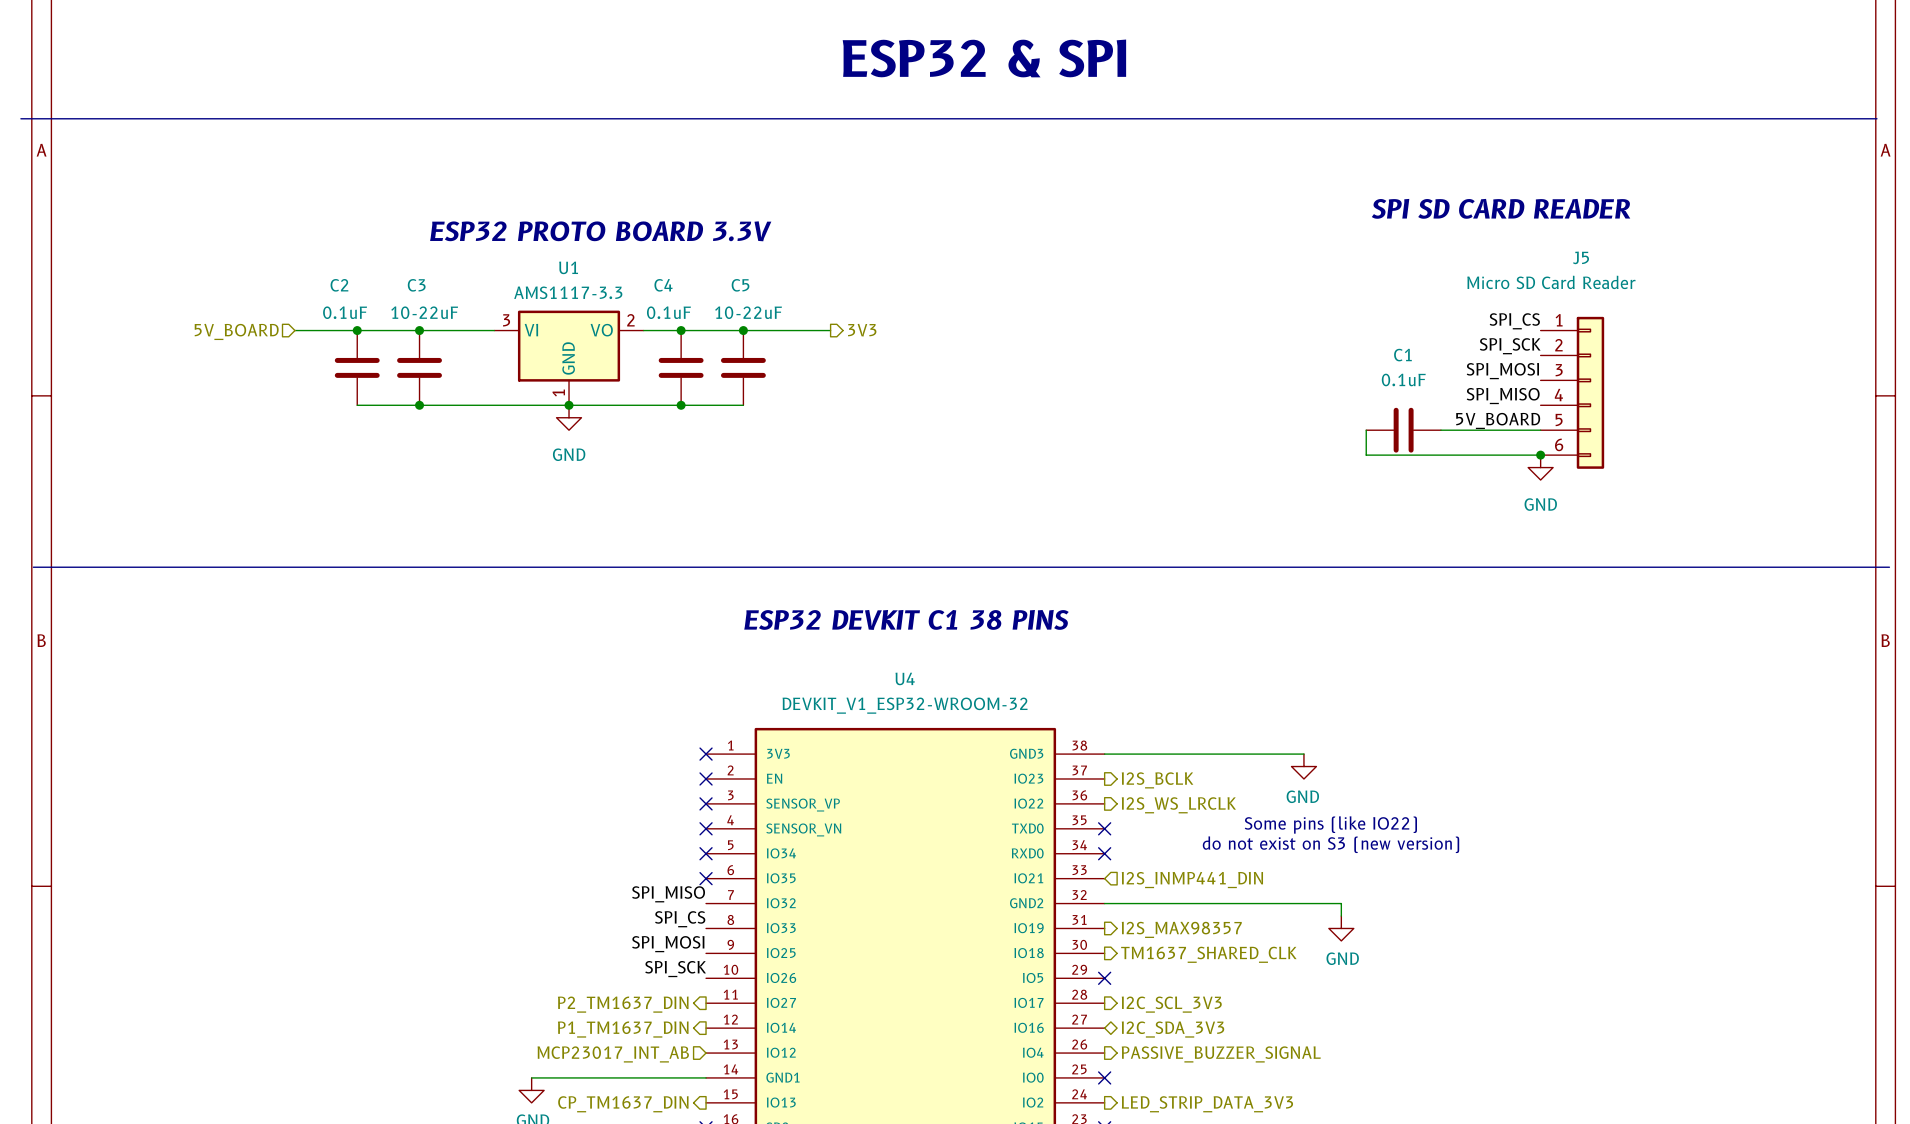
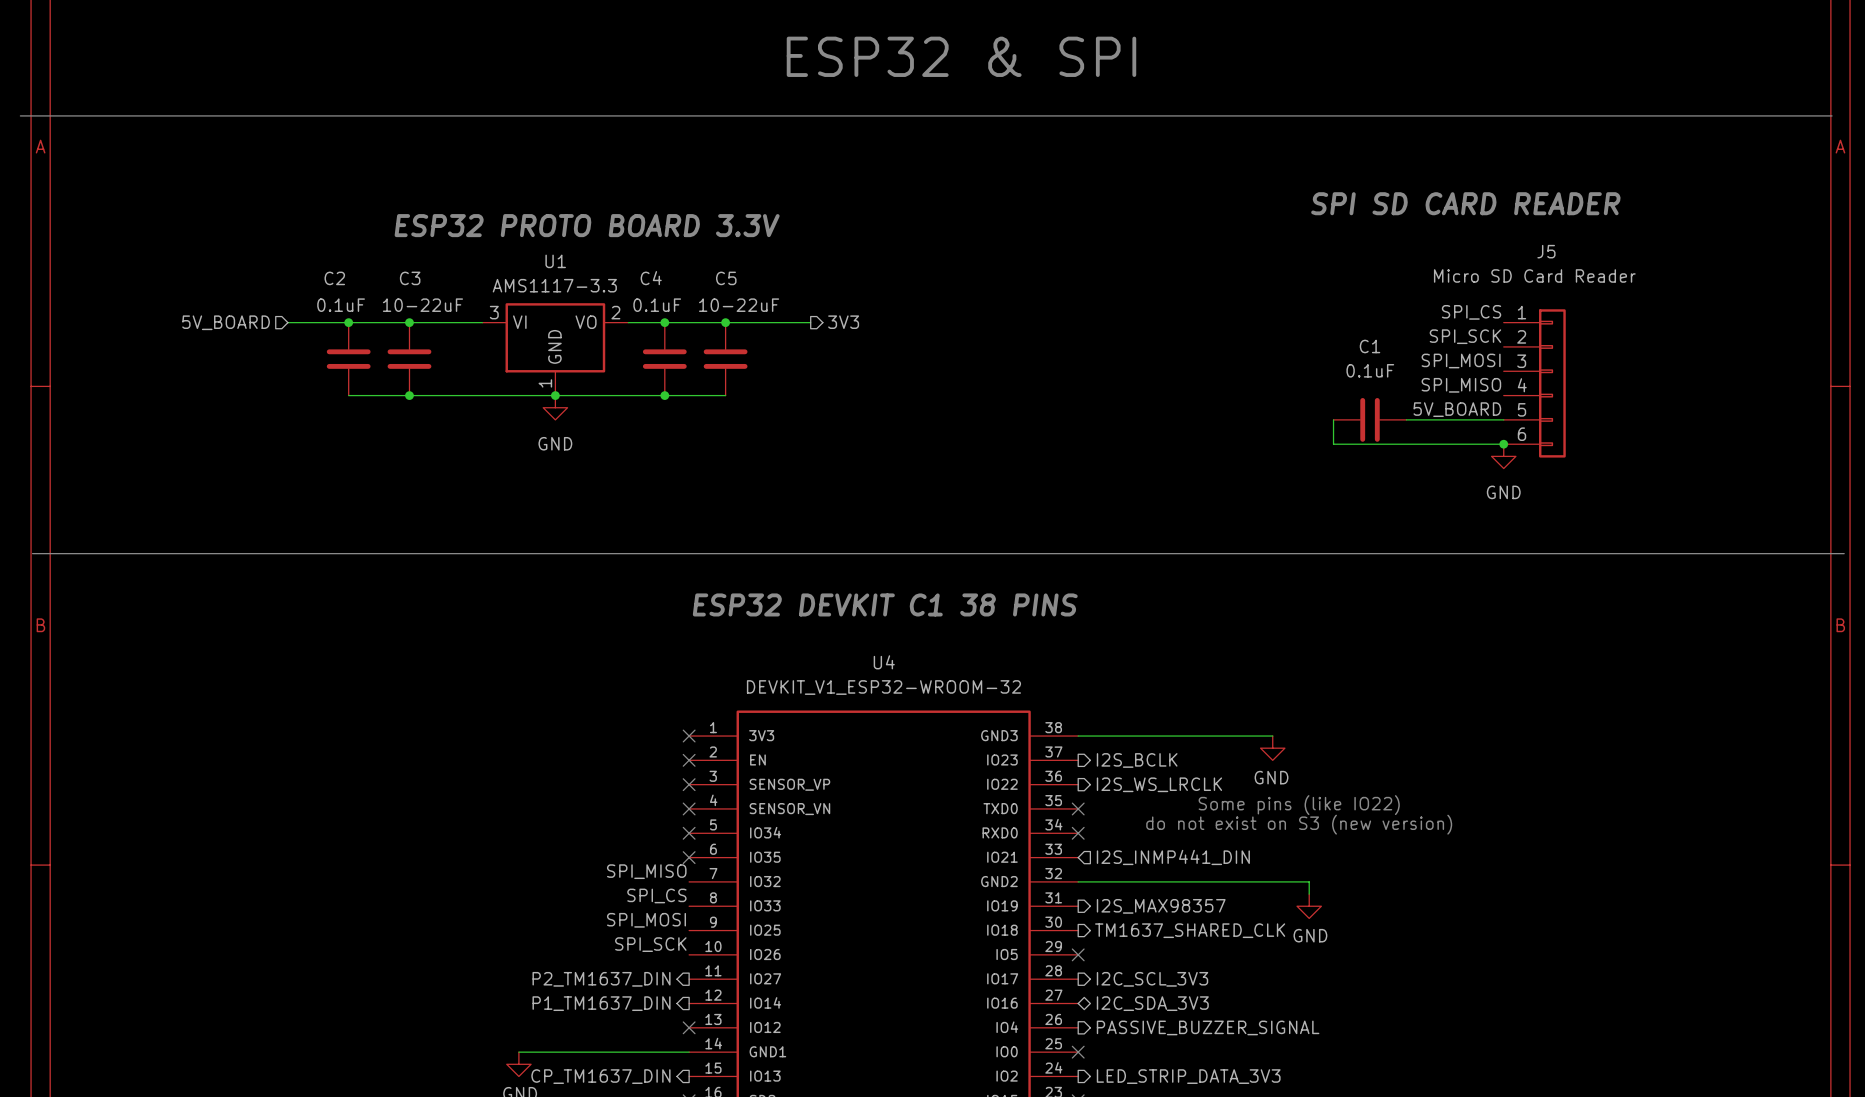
no-connect mark: none -> (689, 1027)
hierarchical label: MCP23017_INT_AB (613, 1054) -> none

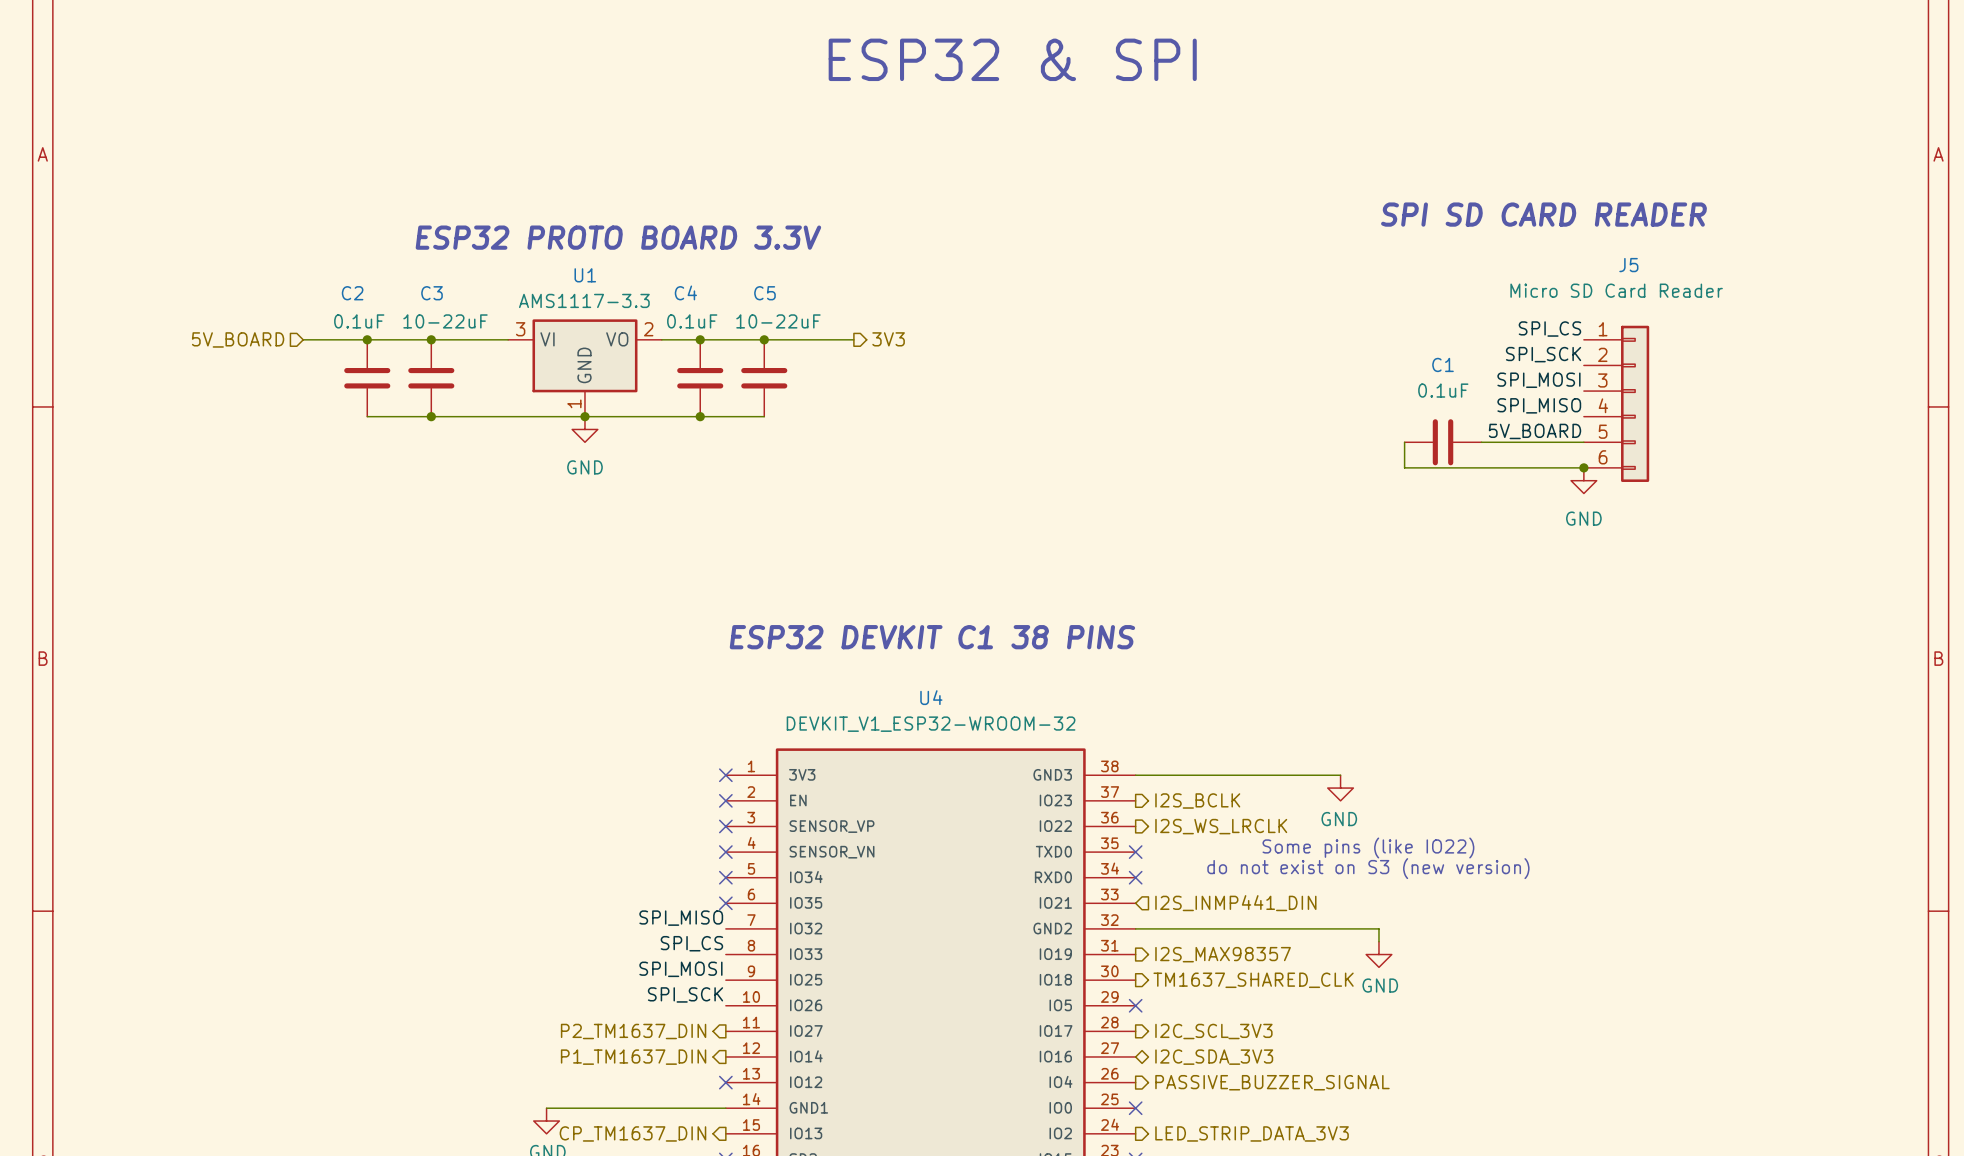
line: (20, 115) (1832, 115) -> none
line: (32, 553) (1844, 553) -> none

